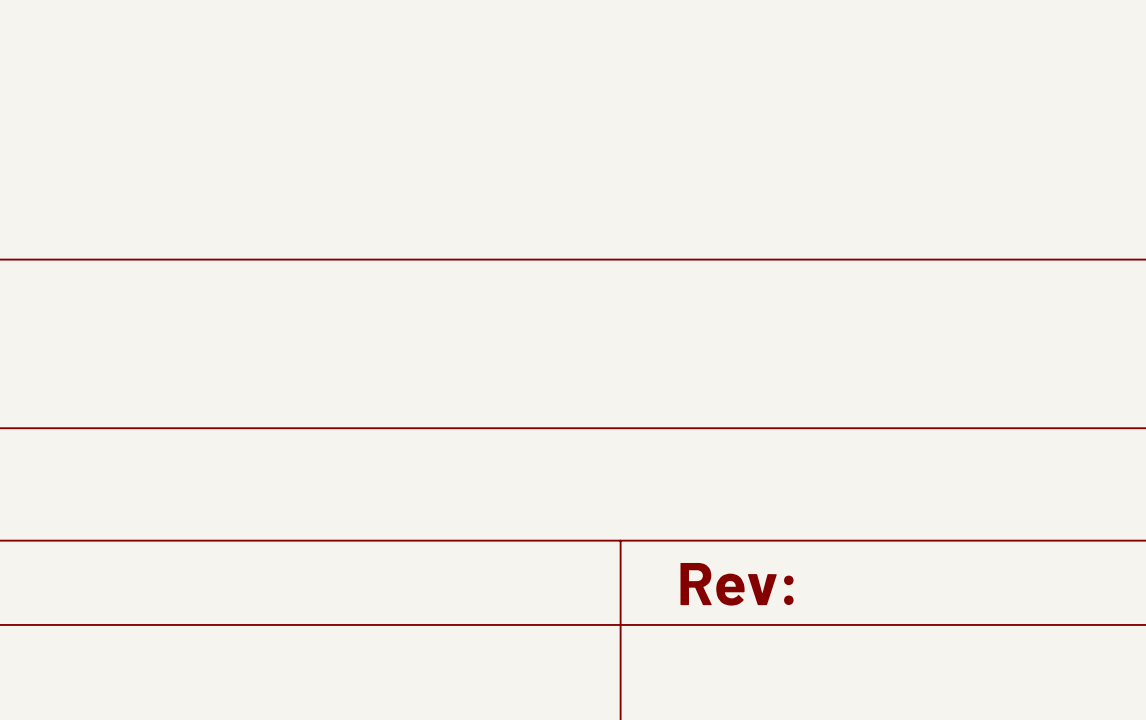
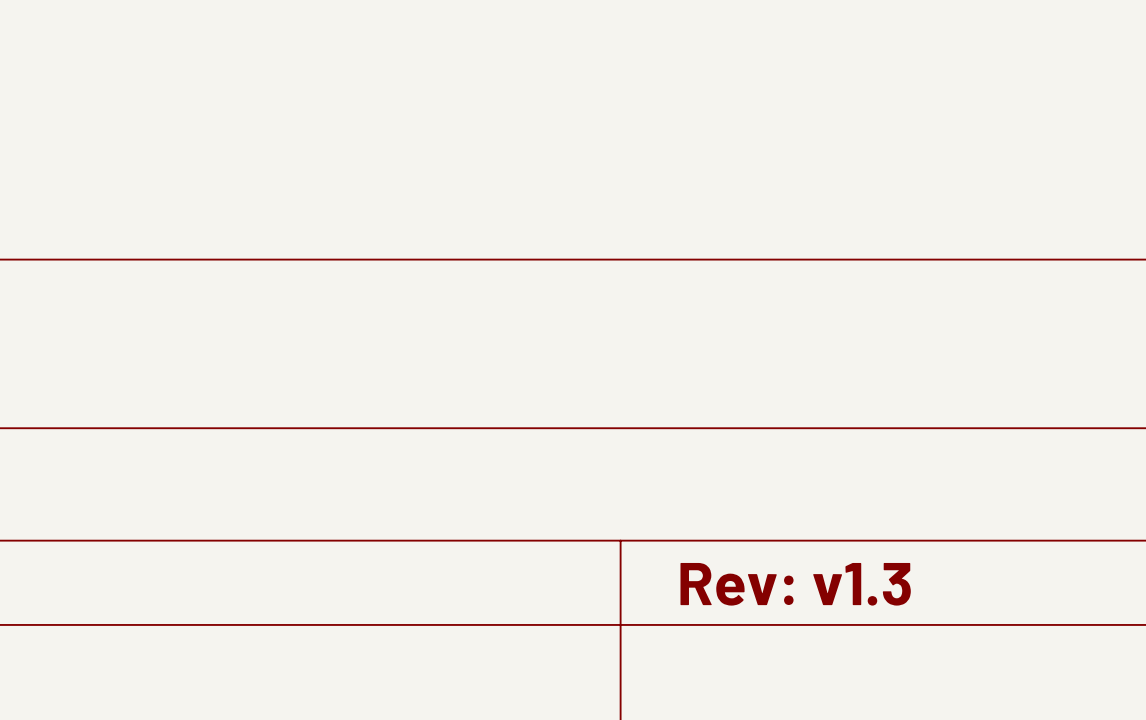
title block: Rev: (737, 584) -> Rev: v1.3 (795, 584)

